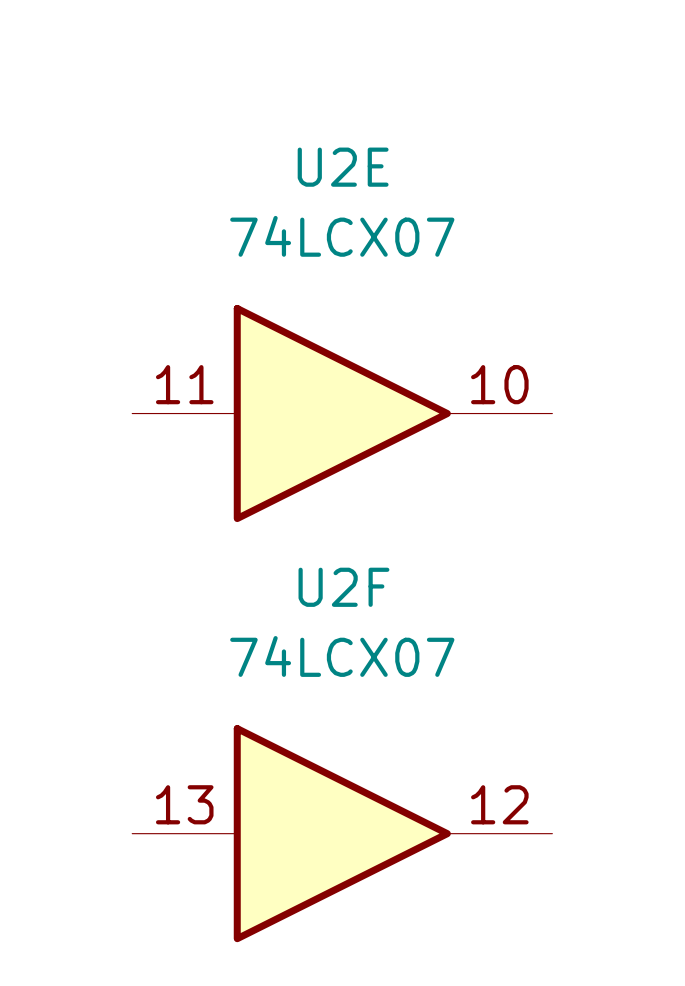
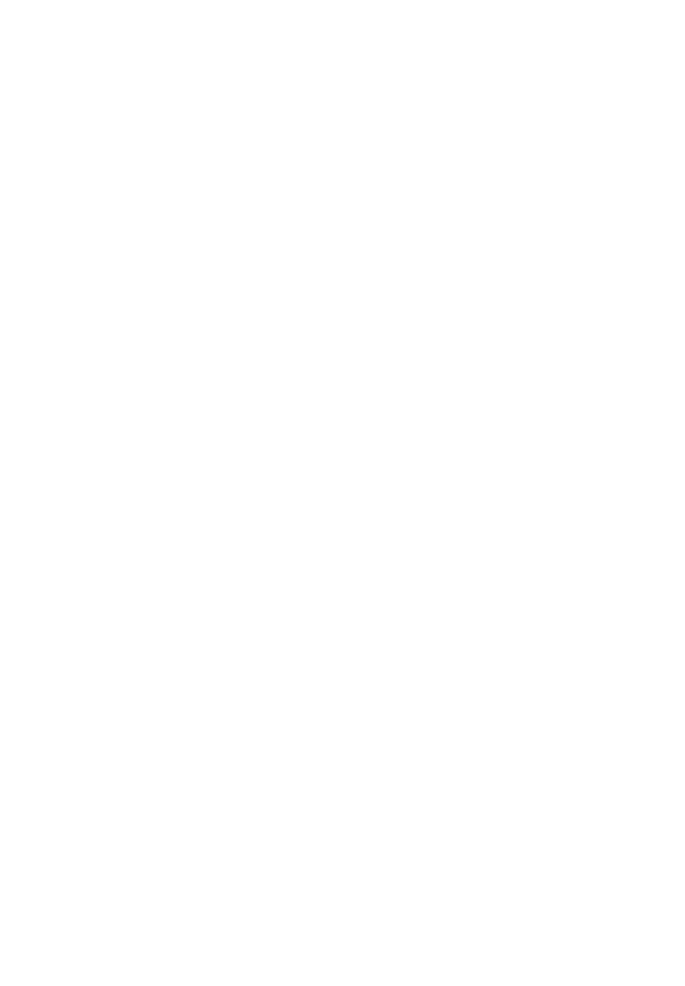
U2E: 74LCX07 (342, 413) -> none
U2F: 74LCX07 (342, 833) -> none

